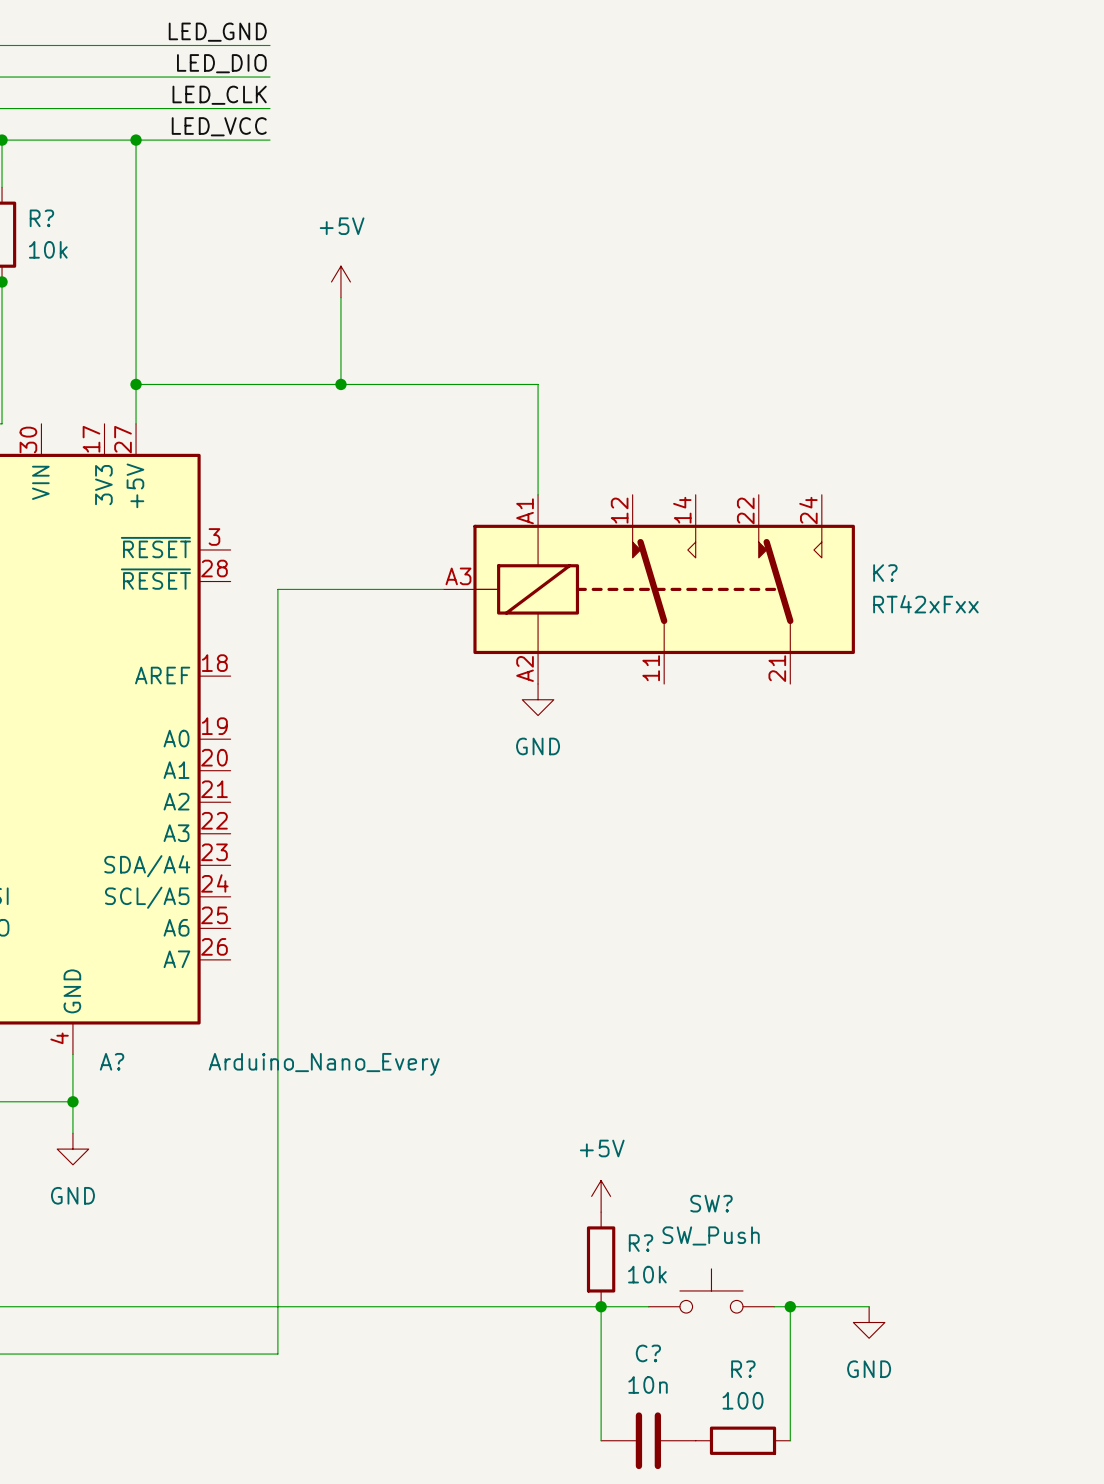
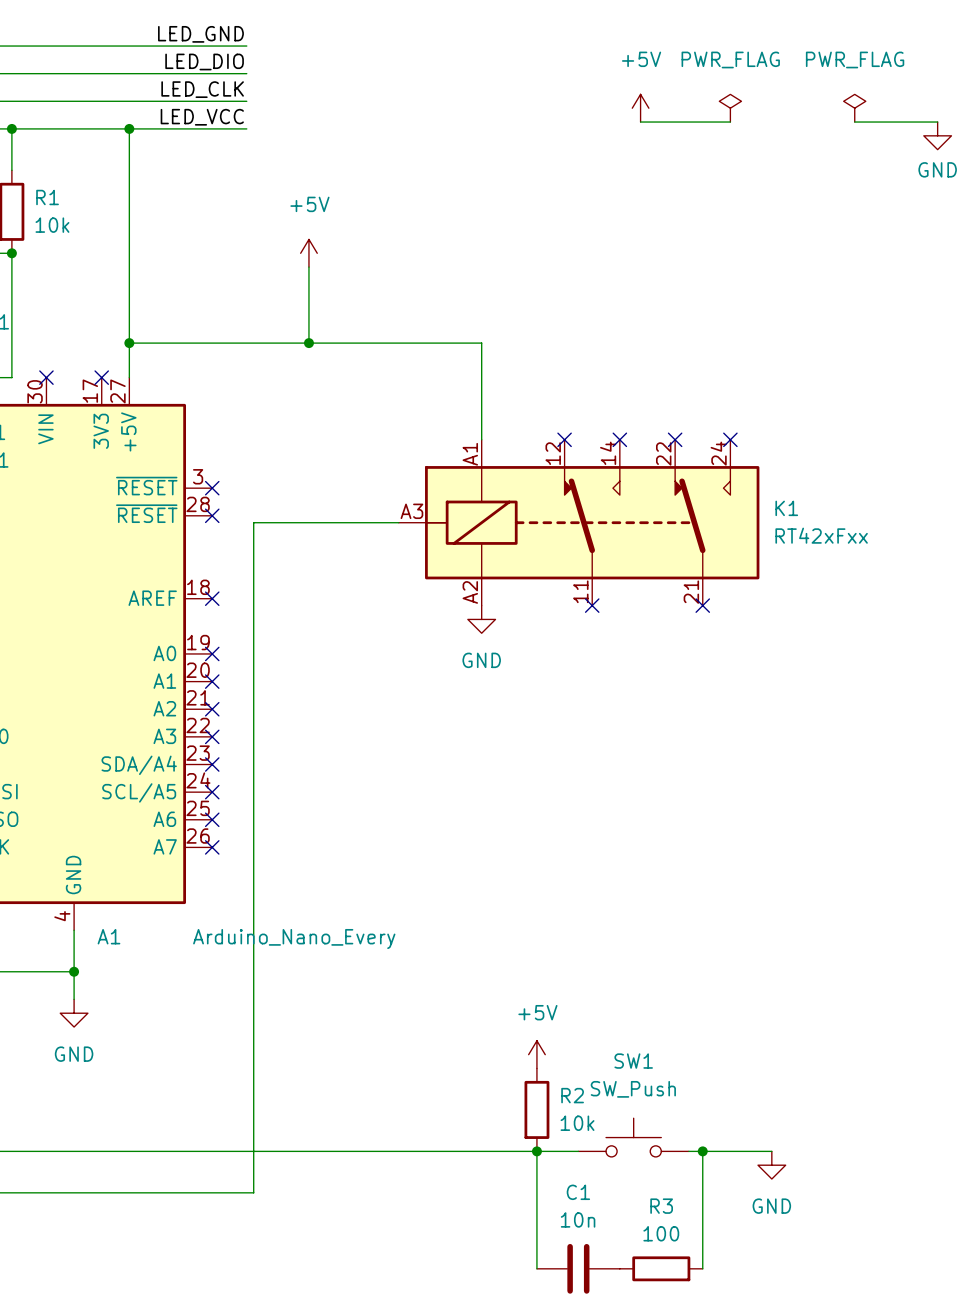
power symbol: none -> +5V (640, 108)
power symbol: none -> PWR_FLAG (730, 108)
power symbol: none -> PWR_FLAG (854, 108)
wire: none -> (640, 122) (730, 122)
wire: none -> (854, 122) (937, 122)
power symbol: none -> GND (937, 135)
R? name: R? (41, 218) -> R1 (47, 197)
no-connect mark: none -> (46, 377)
no-connect mark: none -> (101, 377)
no-connect mark: none -> (564, 439)
no-connect mark: none -> (619, 439)
no-connect mark: none -> (675, 439)
no-connect mark: none -> (730, 439)
no-connect mark: none -> (212, 488)
K? name: K? (885, 573) -> K1 (786, 508)
no-connect mark: none -> (212, 515)
no-connect mark: none -> (212, 598)
no-connect mark: none -> (592, 605)
no-connect mark: none -> (702, 605)
no-connect mark: none -> (212, 653)
no-connect mark: none -> (212, 681)
no-connect mark: none -> (212, 709)
no-connect mark: none -> (212, 736)
no-connect mark: none -> (212, 764)
no-connect mark: none -> (212, 792)
no-connect mark: none -> (212, 819)
no-connect mark: none -> (212, 847)
A? name: A? (112, 1061) -> A1 (108, 936)
SW? name: SW? (711, 1203) -> SW1 (633, 1061)
R? name: R? (641, 1243) -> R2 (572, 1095)
C? name: C? (648, 1353) -> C1 (578, 1192)
R? name: R? (743, 1369) -> R3 (661, 1206)

